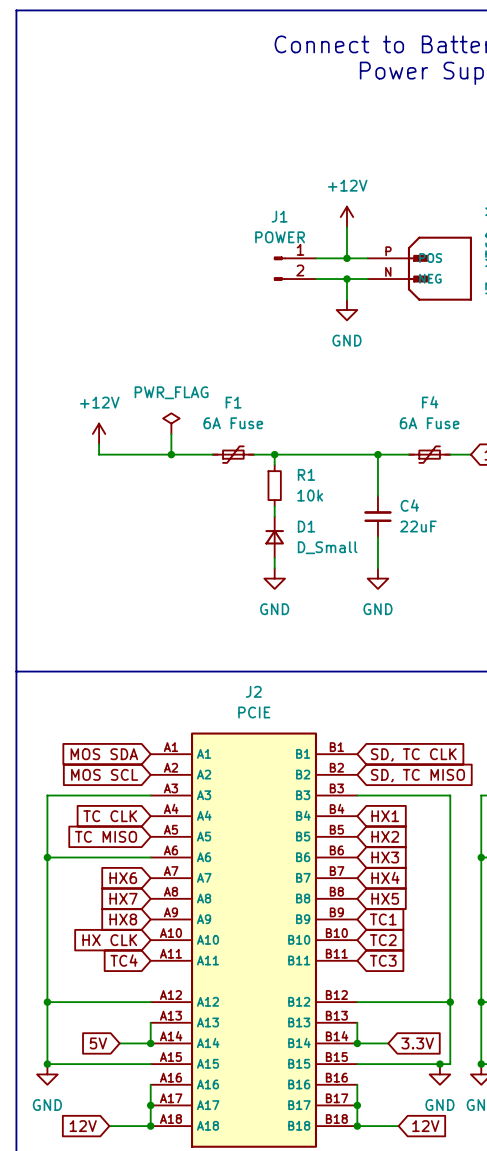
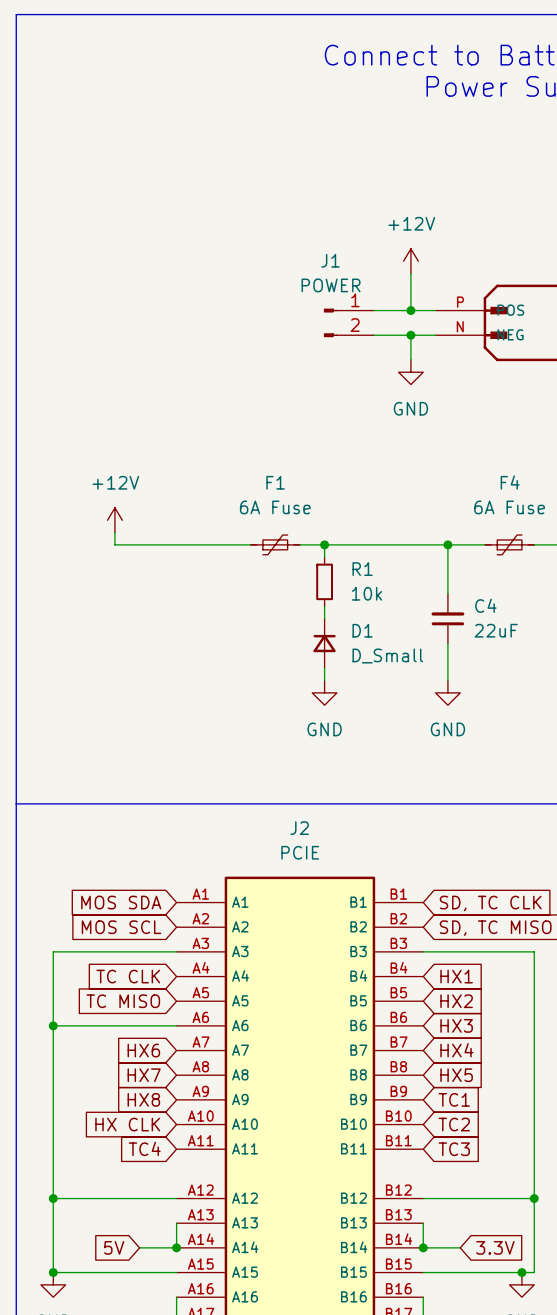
power symbol: PWR_FLAG (171, 423) -> none
wire: (171, 433) (171, 454) -> none
junction: (171, 454) -> none

